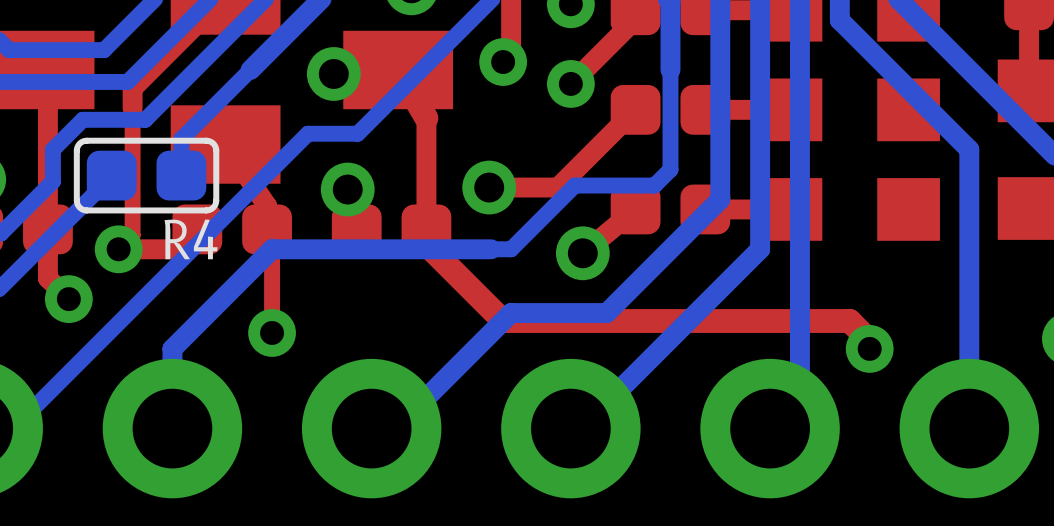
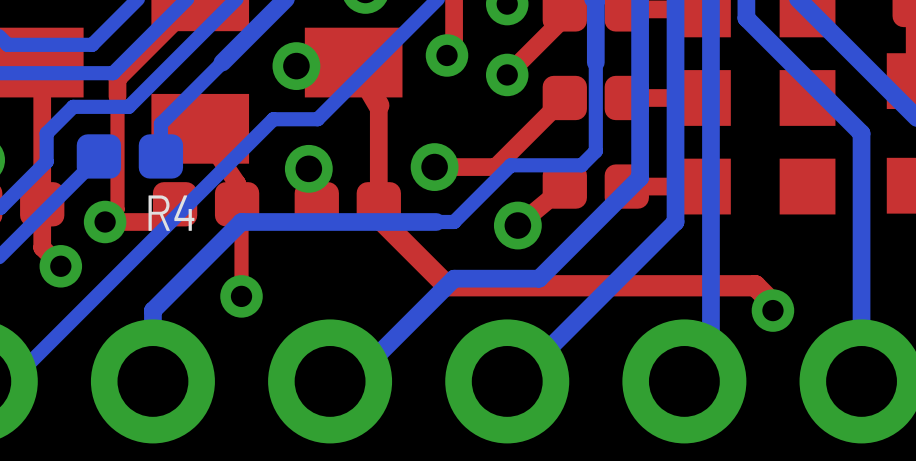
R4 footprint: [73, 137, 220, 214] -> [76, 134, 184, 179]

